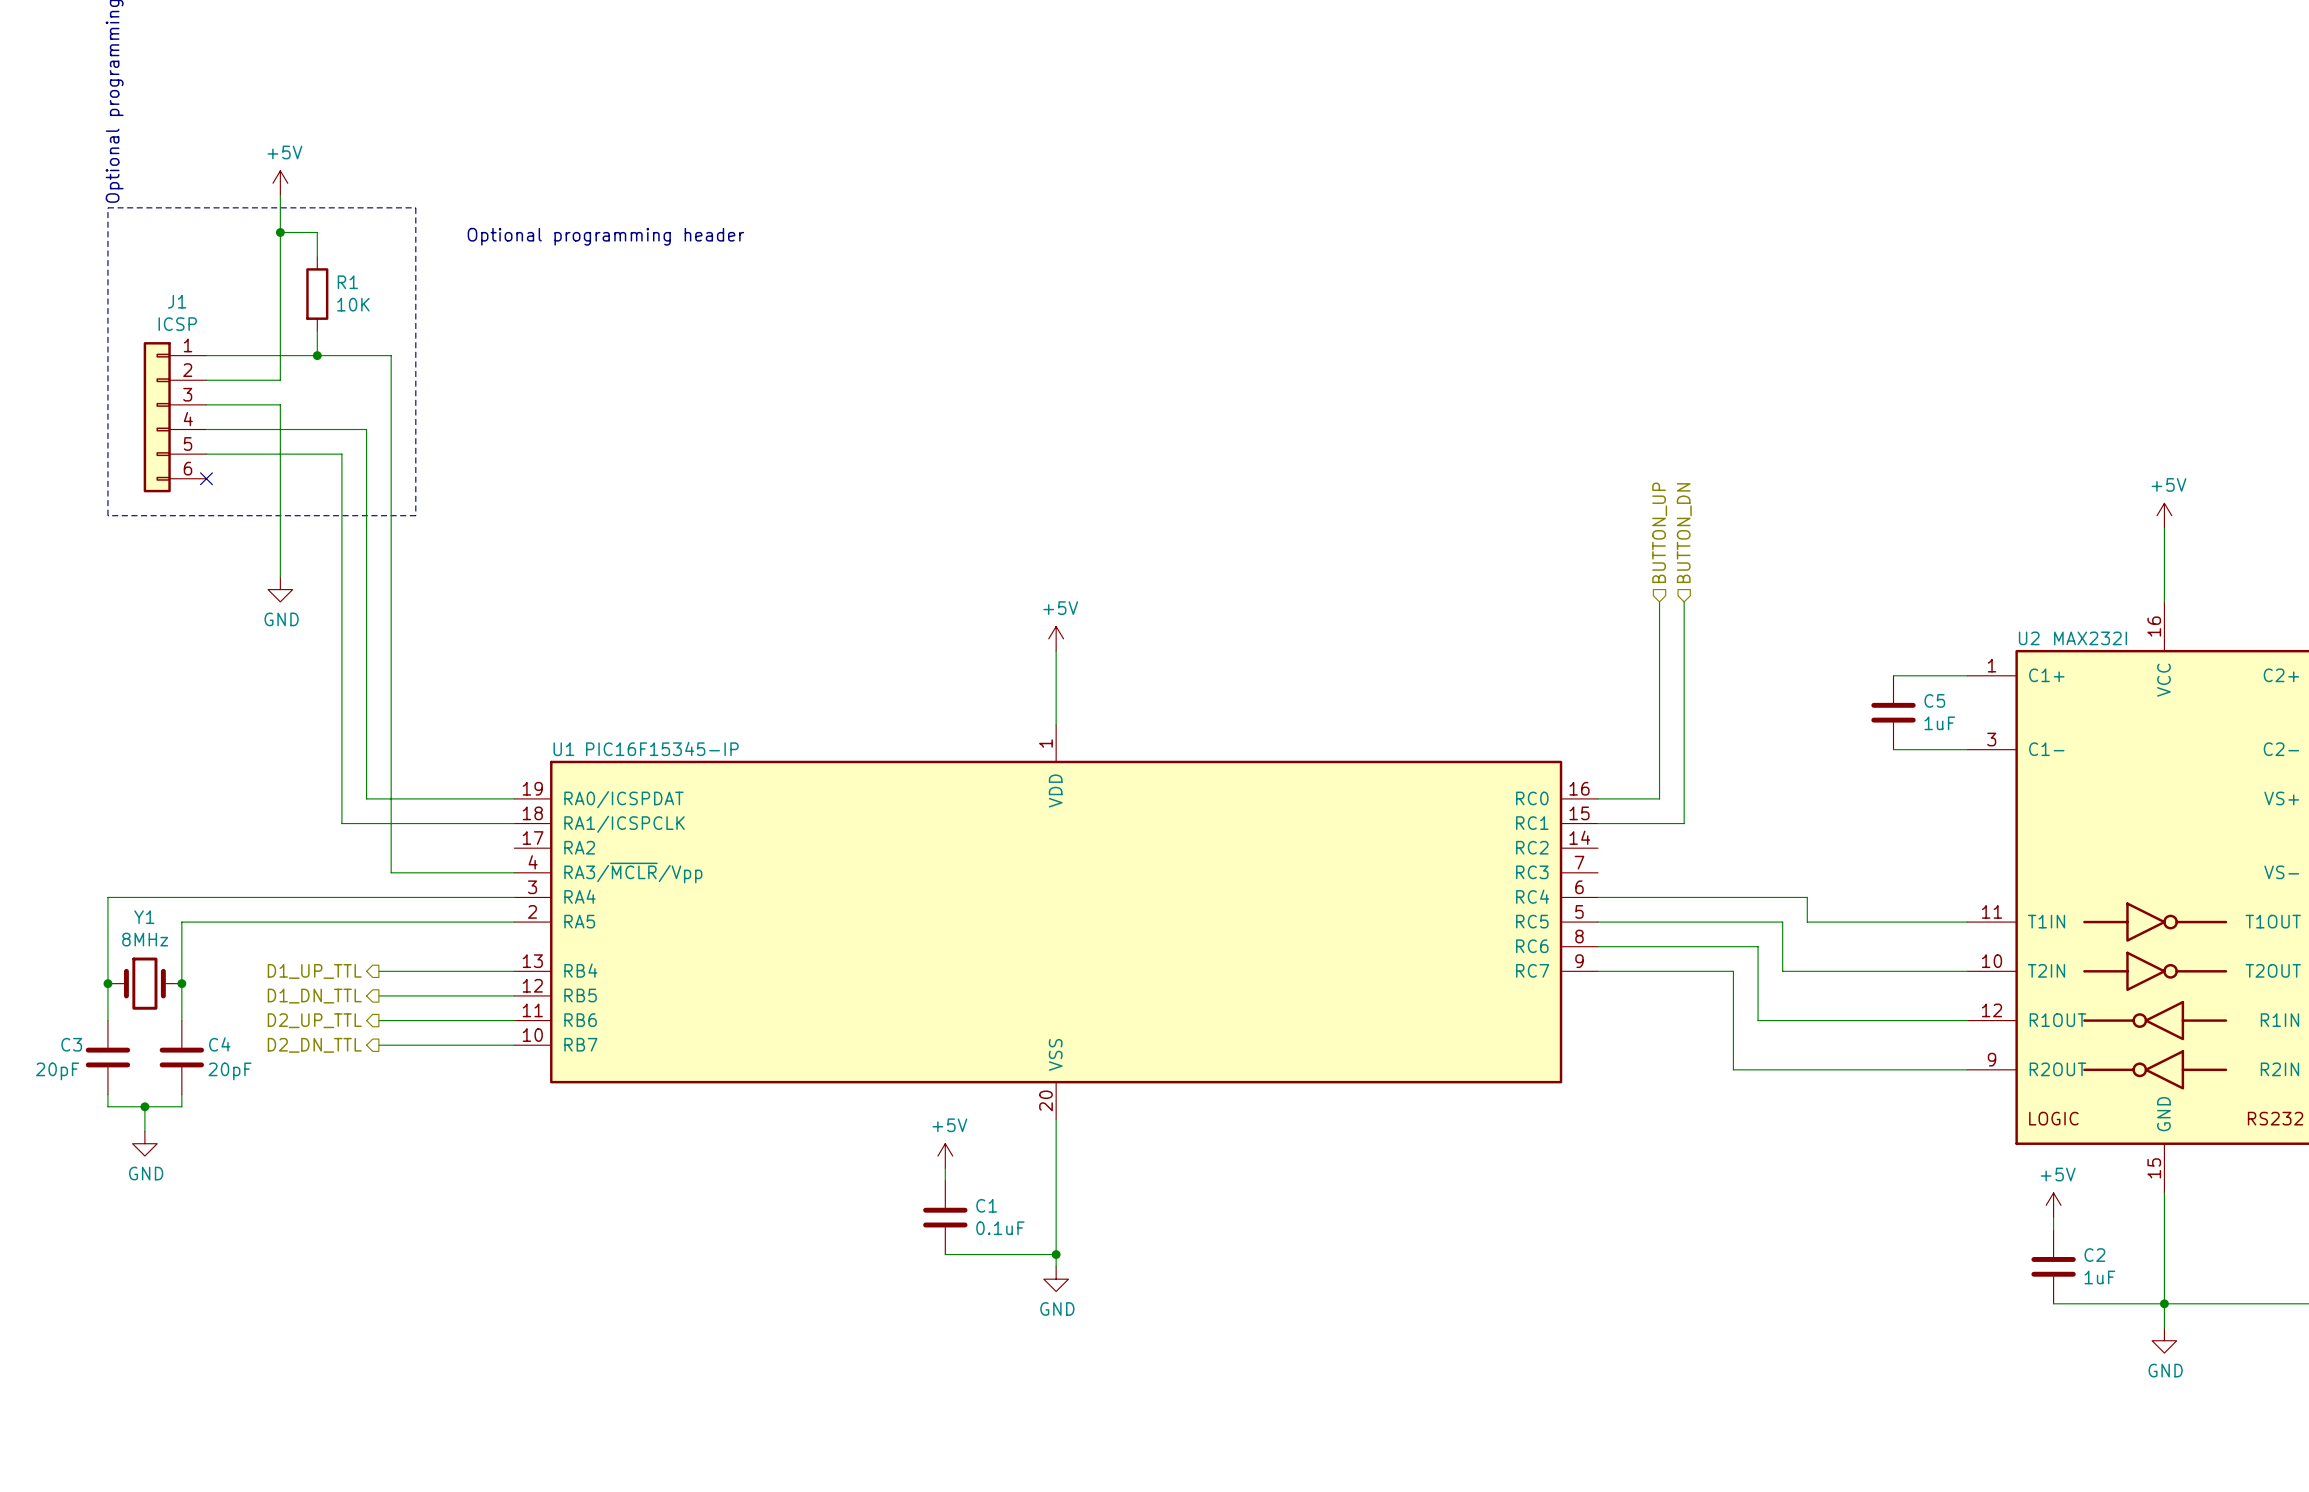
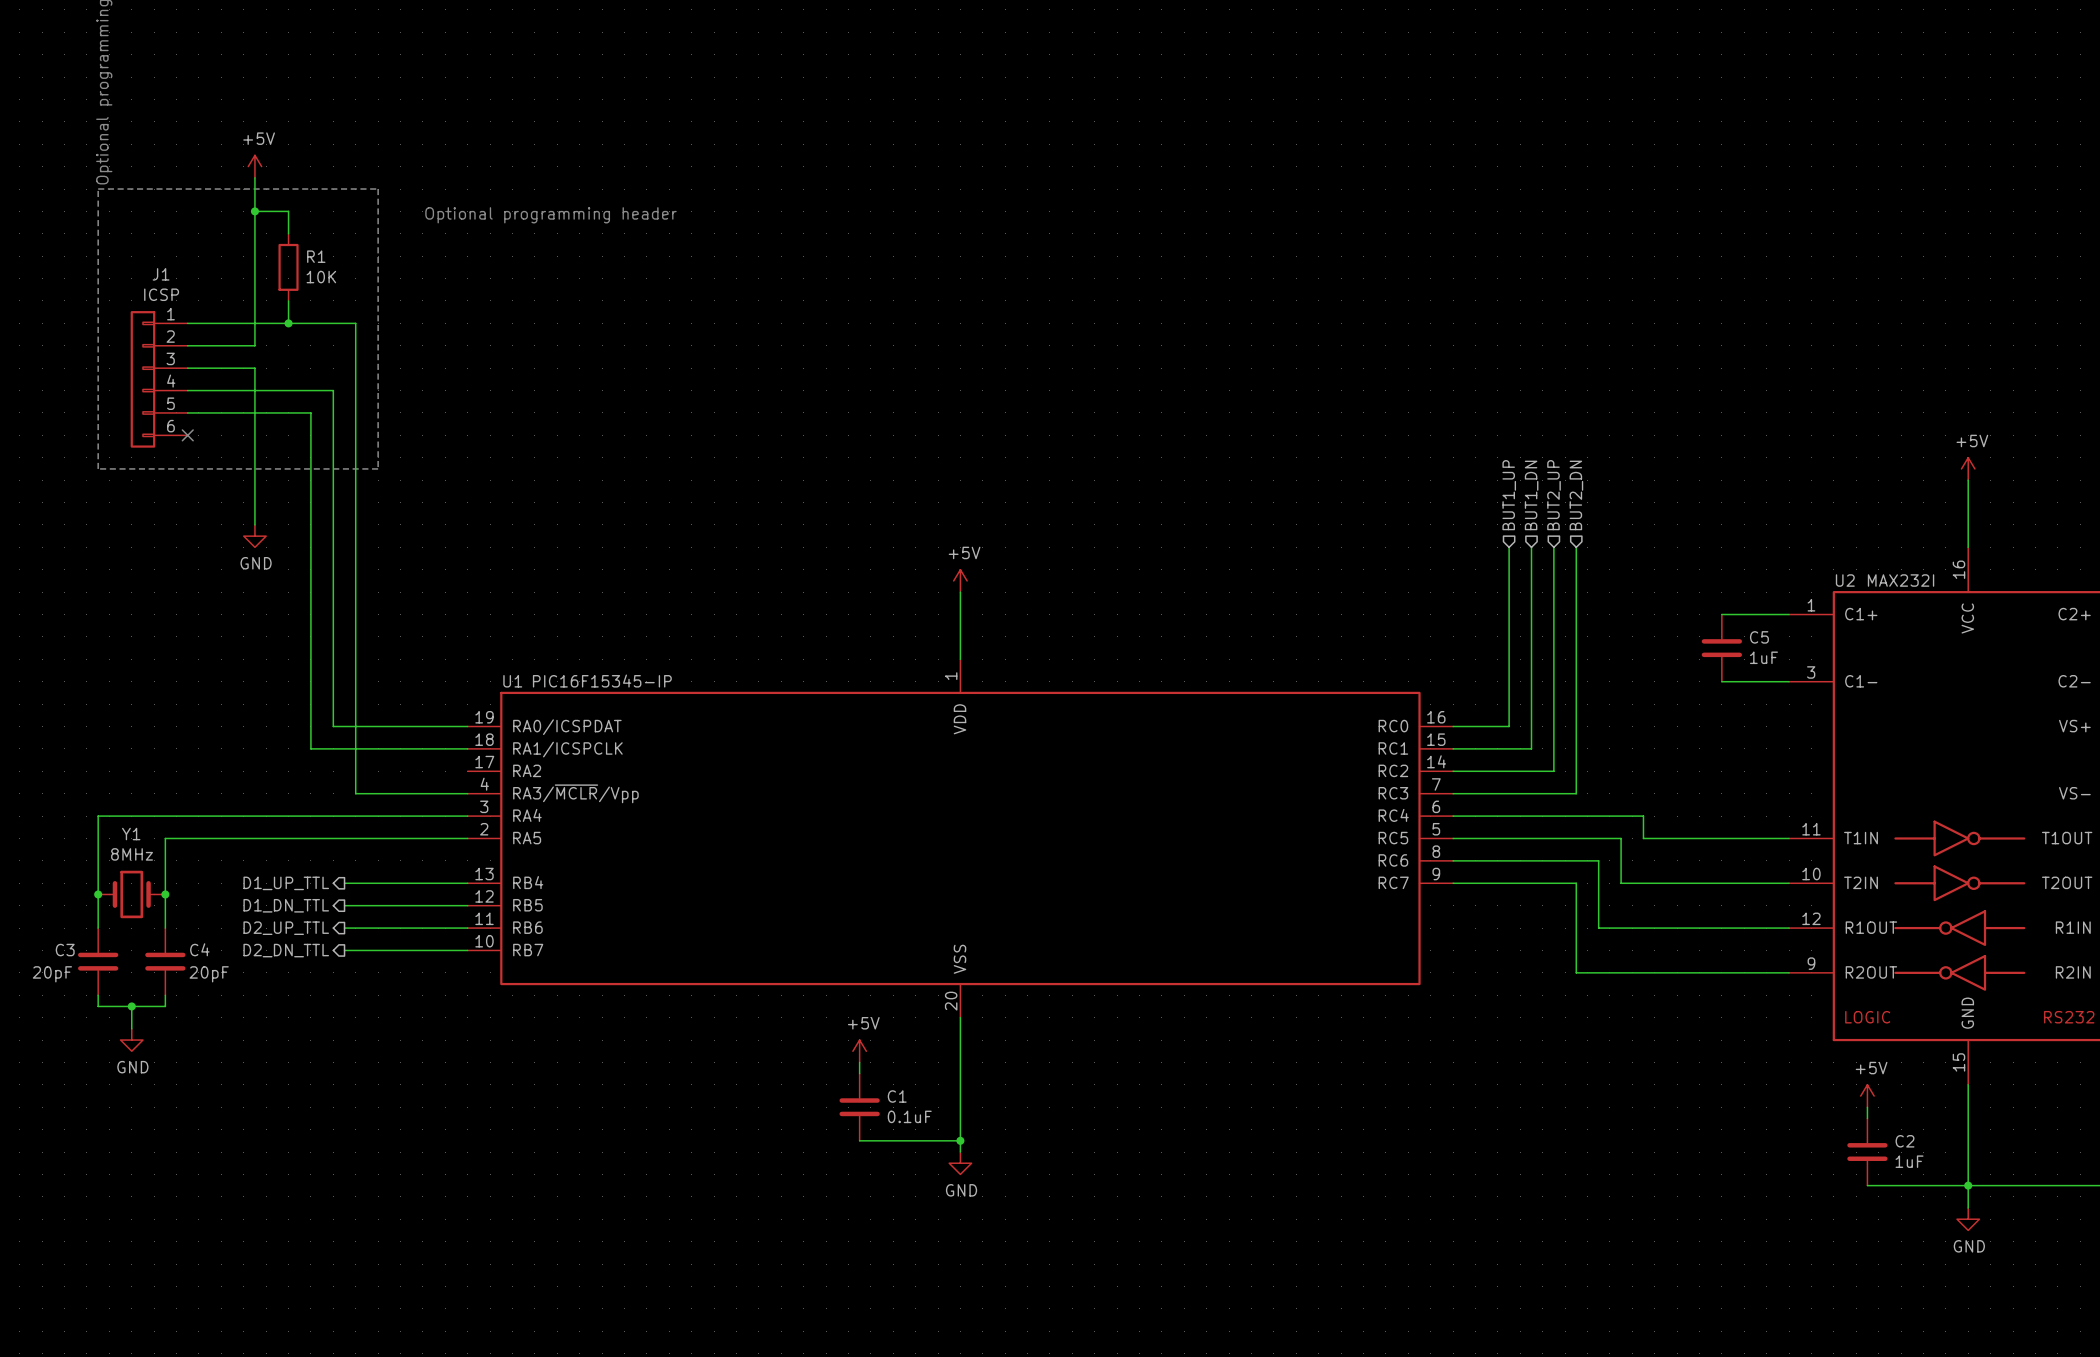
hierarchical label: BUTTON_UP (1659, 532) -> BUT1_UP (1509, 495)
hierarchical label: BUTTON_DN (1684, 533) -> BUT1_DN (1531, 495)
hierarchical label: none -> BUT2_UP (1554, 495)
hierarchical label: none -> BUT2_DN (1576, 495)
wire: none -> (1553, 547) (1553, 771) (1453, 771)
wire: none -> (1576, 547) (1576, 793) (1453, 793)

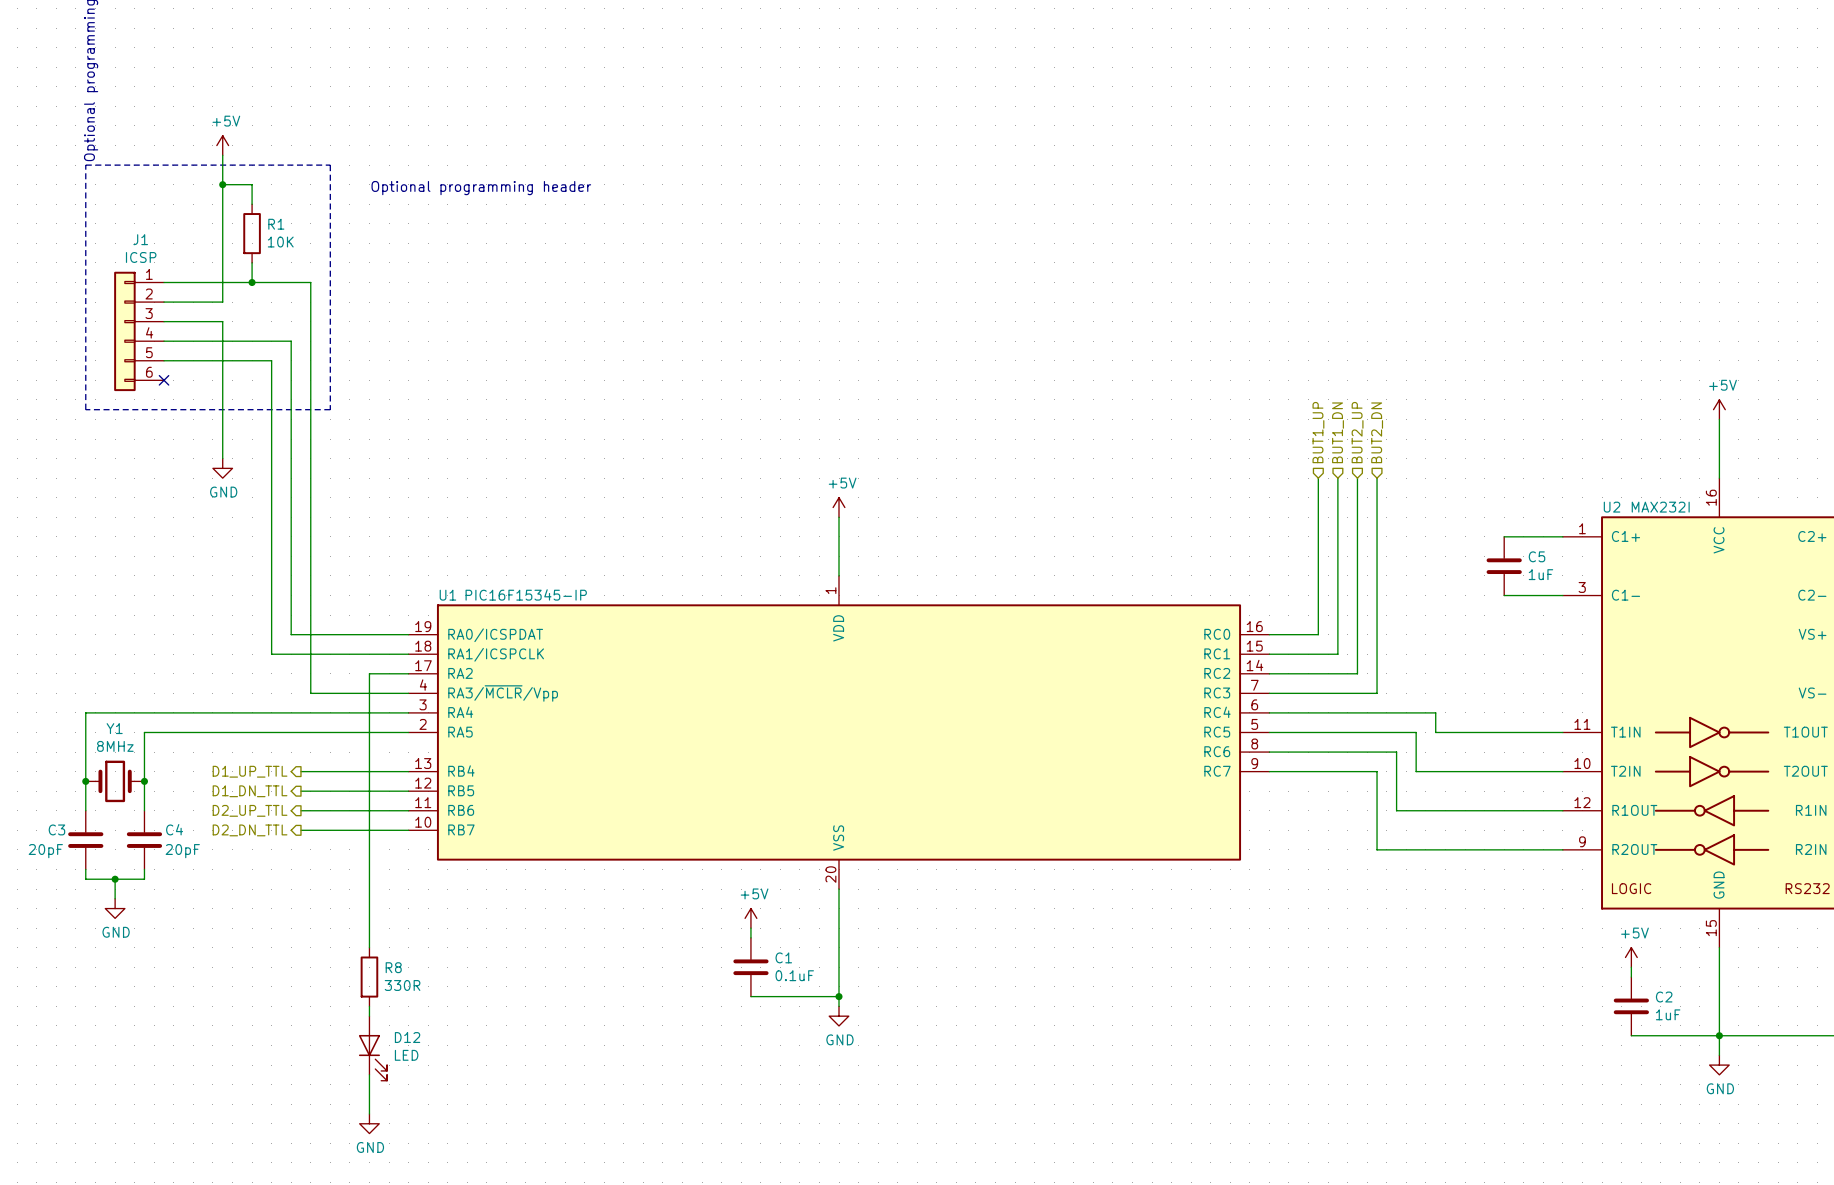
wire: none -> (408, 673) (369, 673) (369, 947)
R8: none -> 330R (369, 977)
wire: none -> (369, 1006) (369, 1016)
D12: none -> LED (372, 1048)
wire: none -> (369, 1074) (369, 1113)
power symbol: none -> GND (369, 1123)

